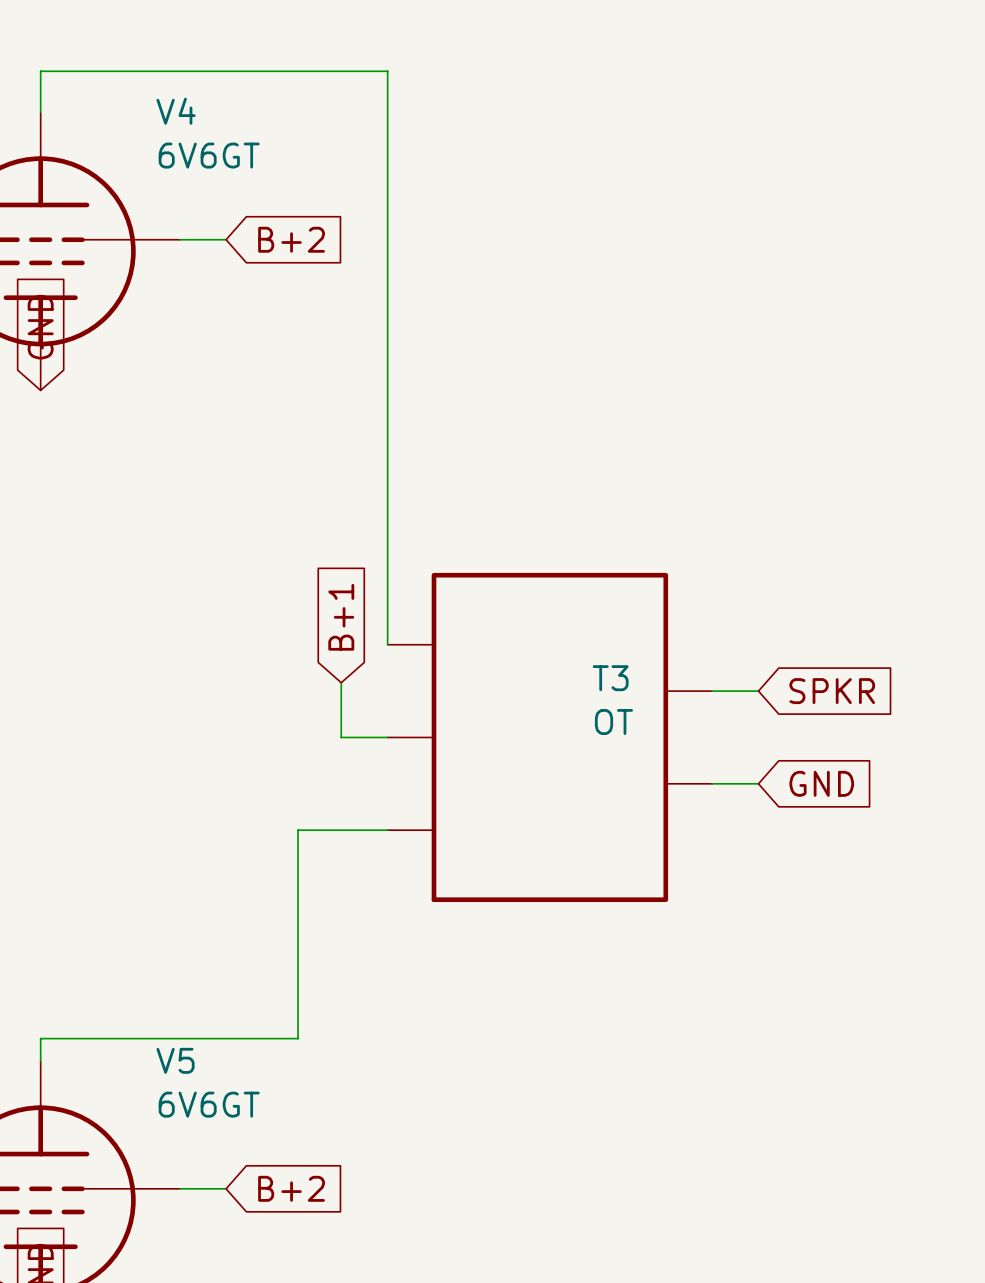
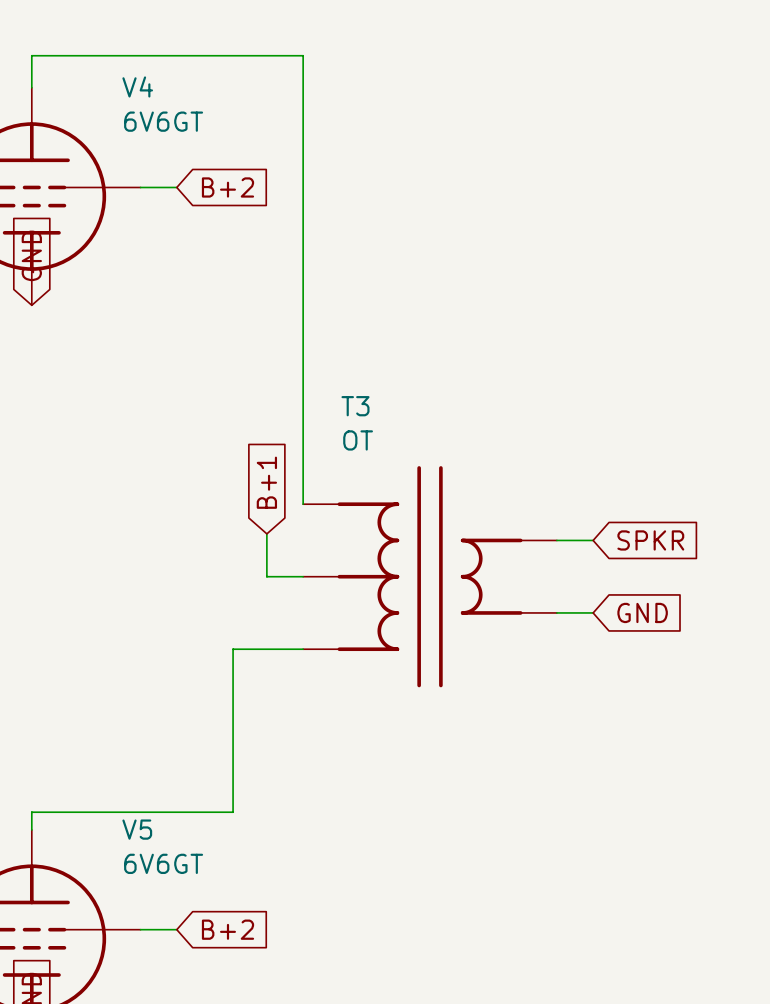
T3 symbol: [387, 572, 713, 903] -> [303, 466, 557, 688]
T3 name position: T3 (610, 678) -> T3 (355, 406)
T3 value position: OT (613, 721) -> OT (358, 440)

